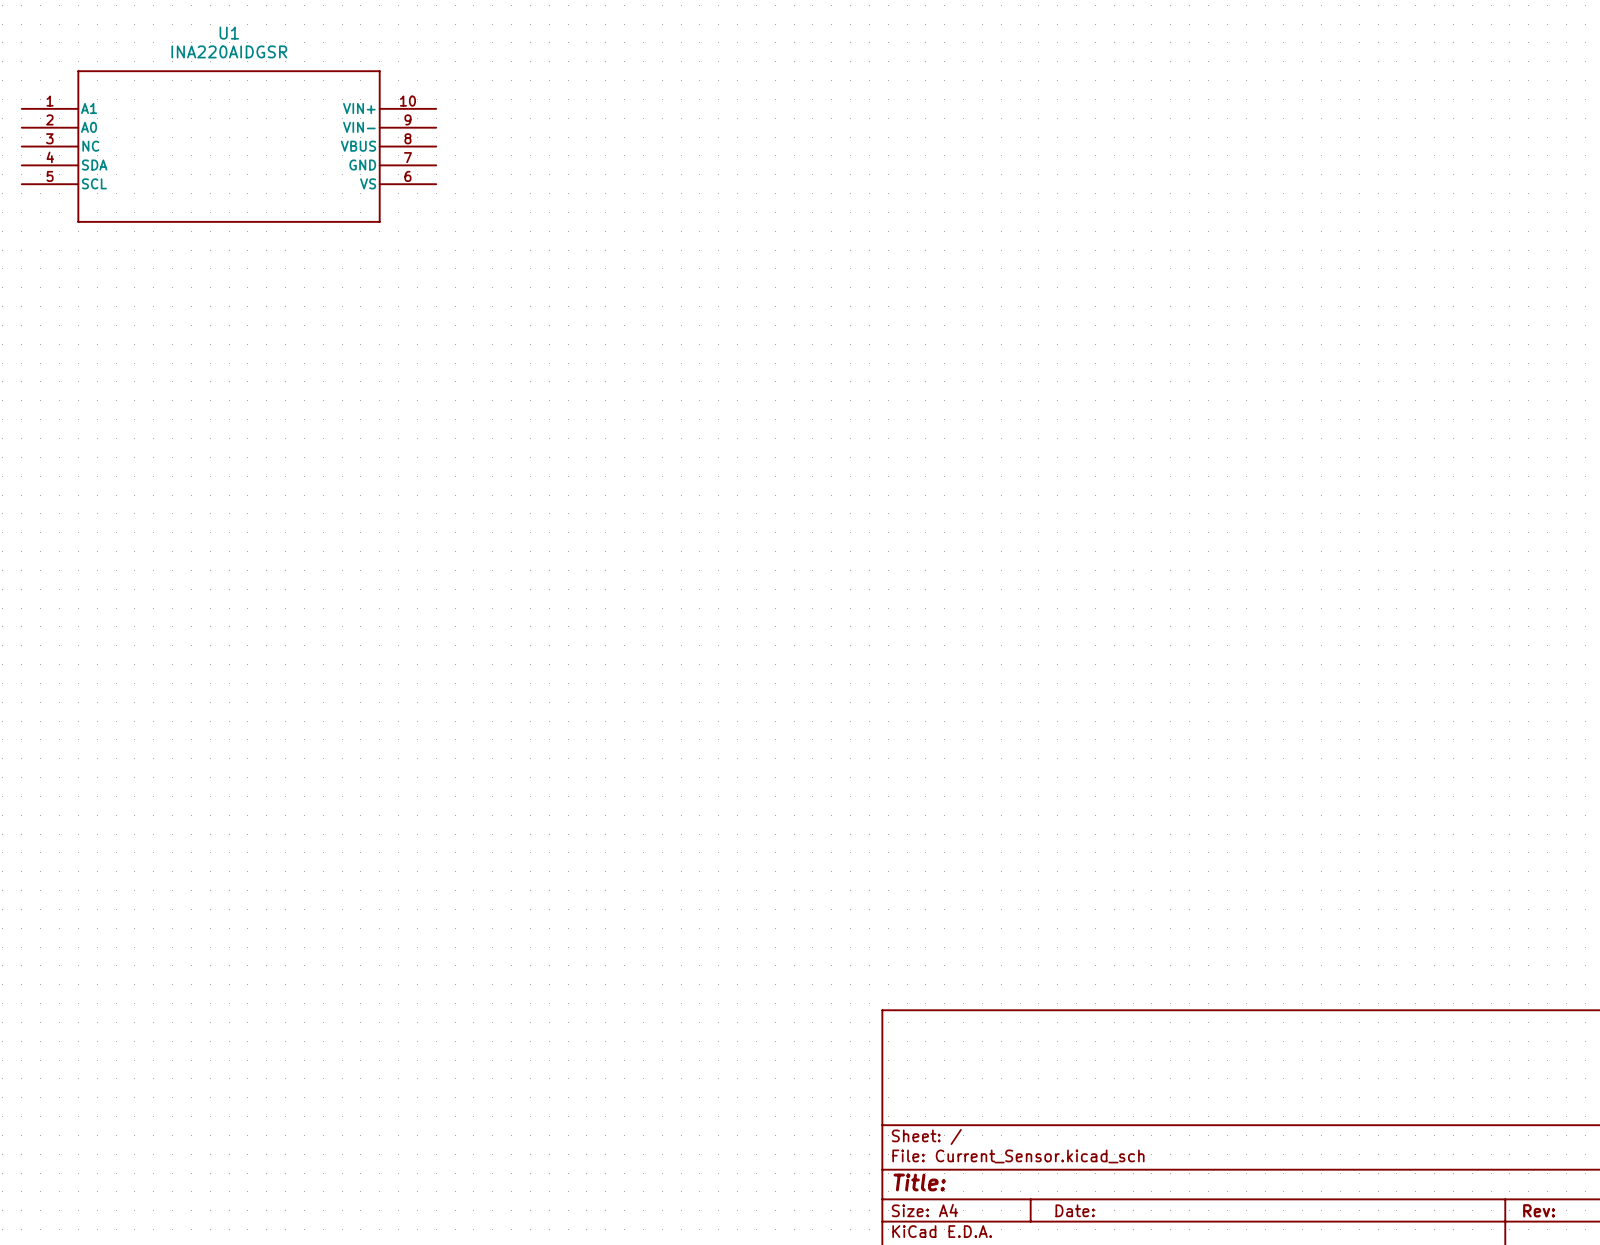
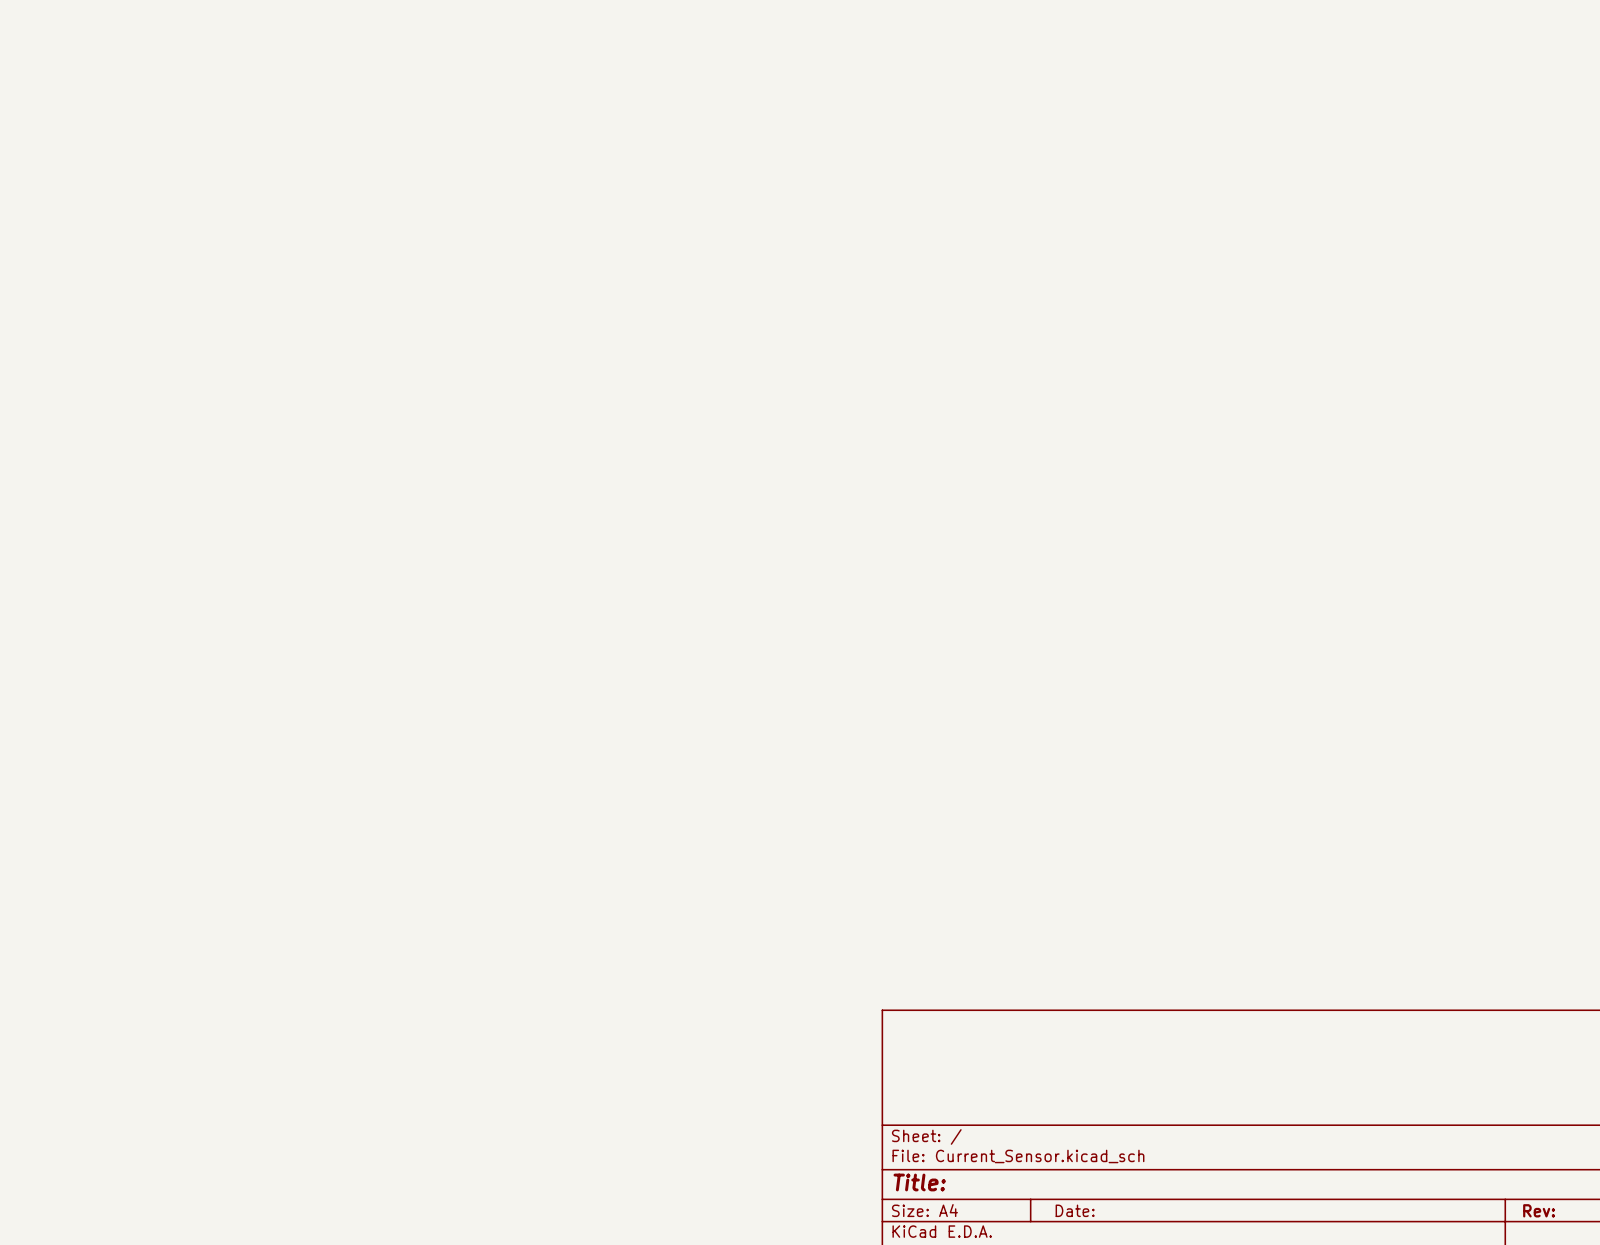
U1: INA220AIDGSR (229, 146) -> none

